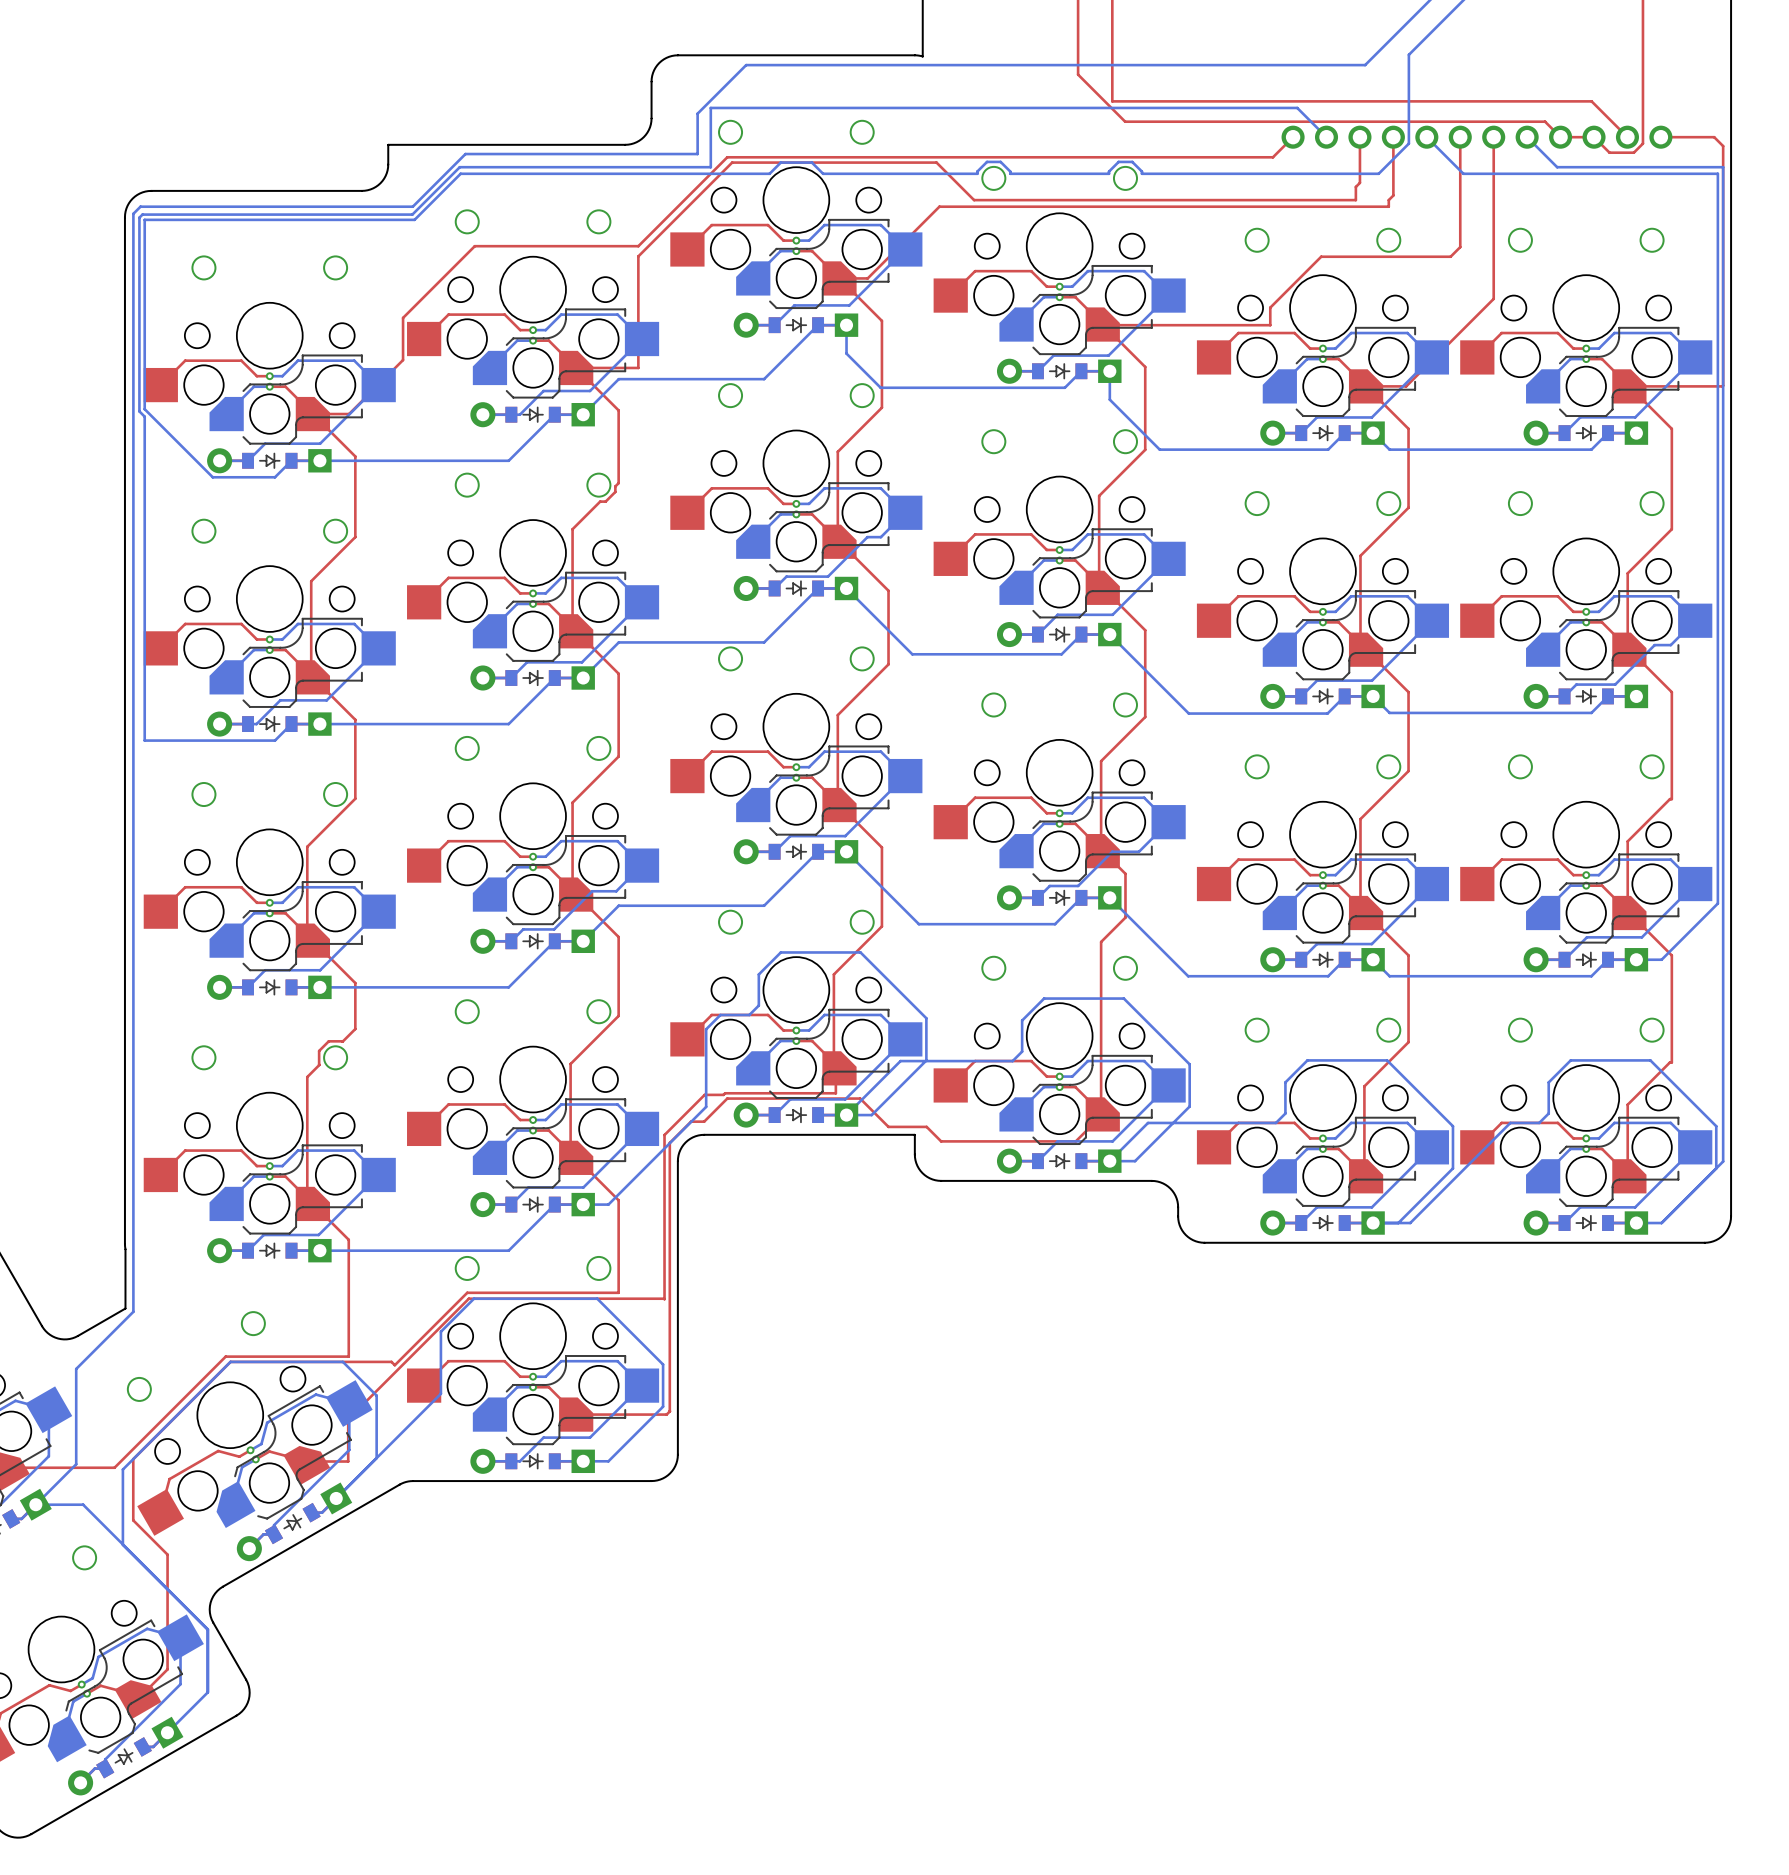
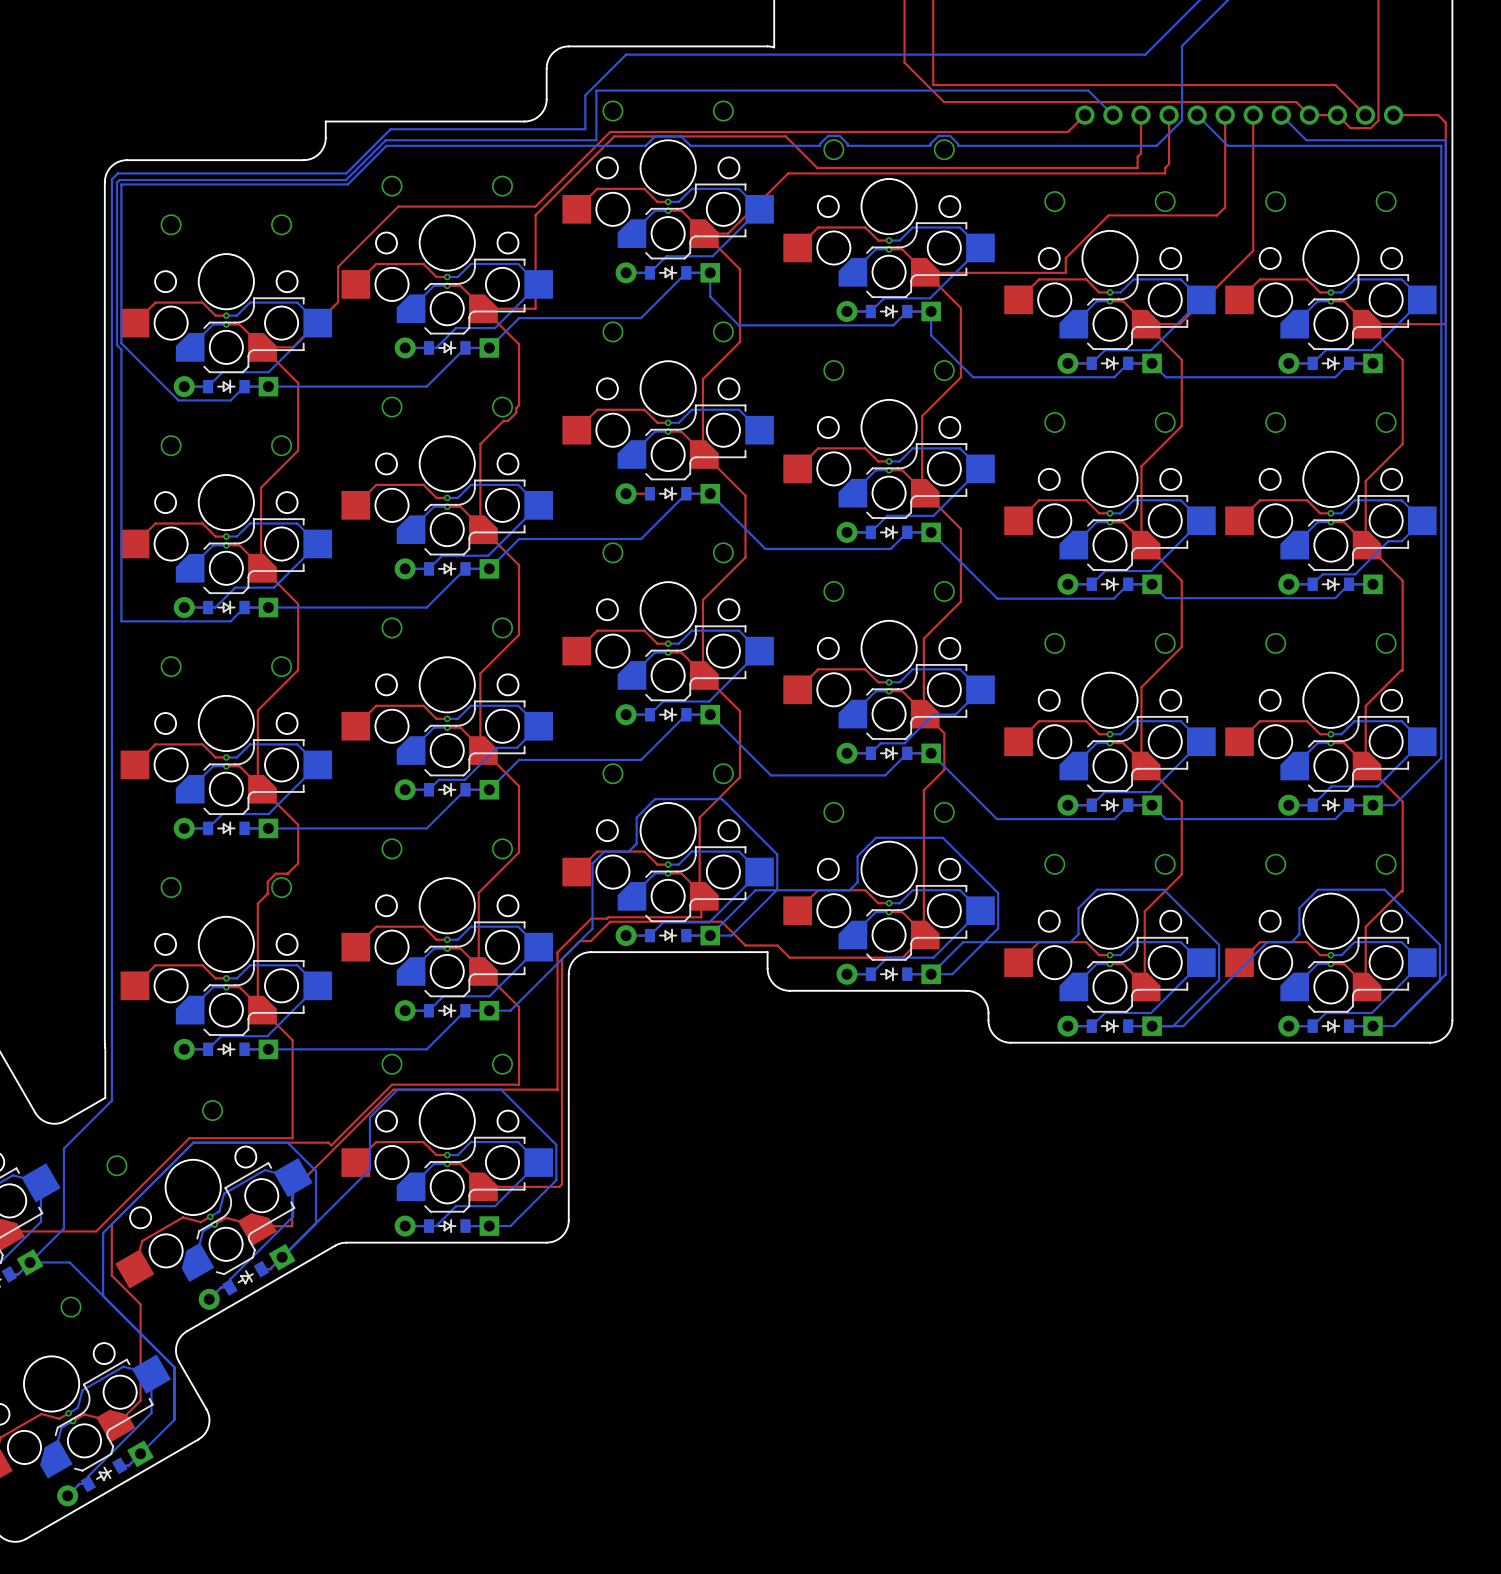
bottom track: (905, 512) (880, 537) (867, 537) (827, 576) (786, 576) (774, 588) (746, 588) -> none

